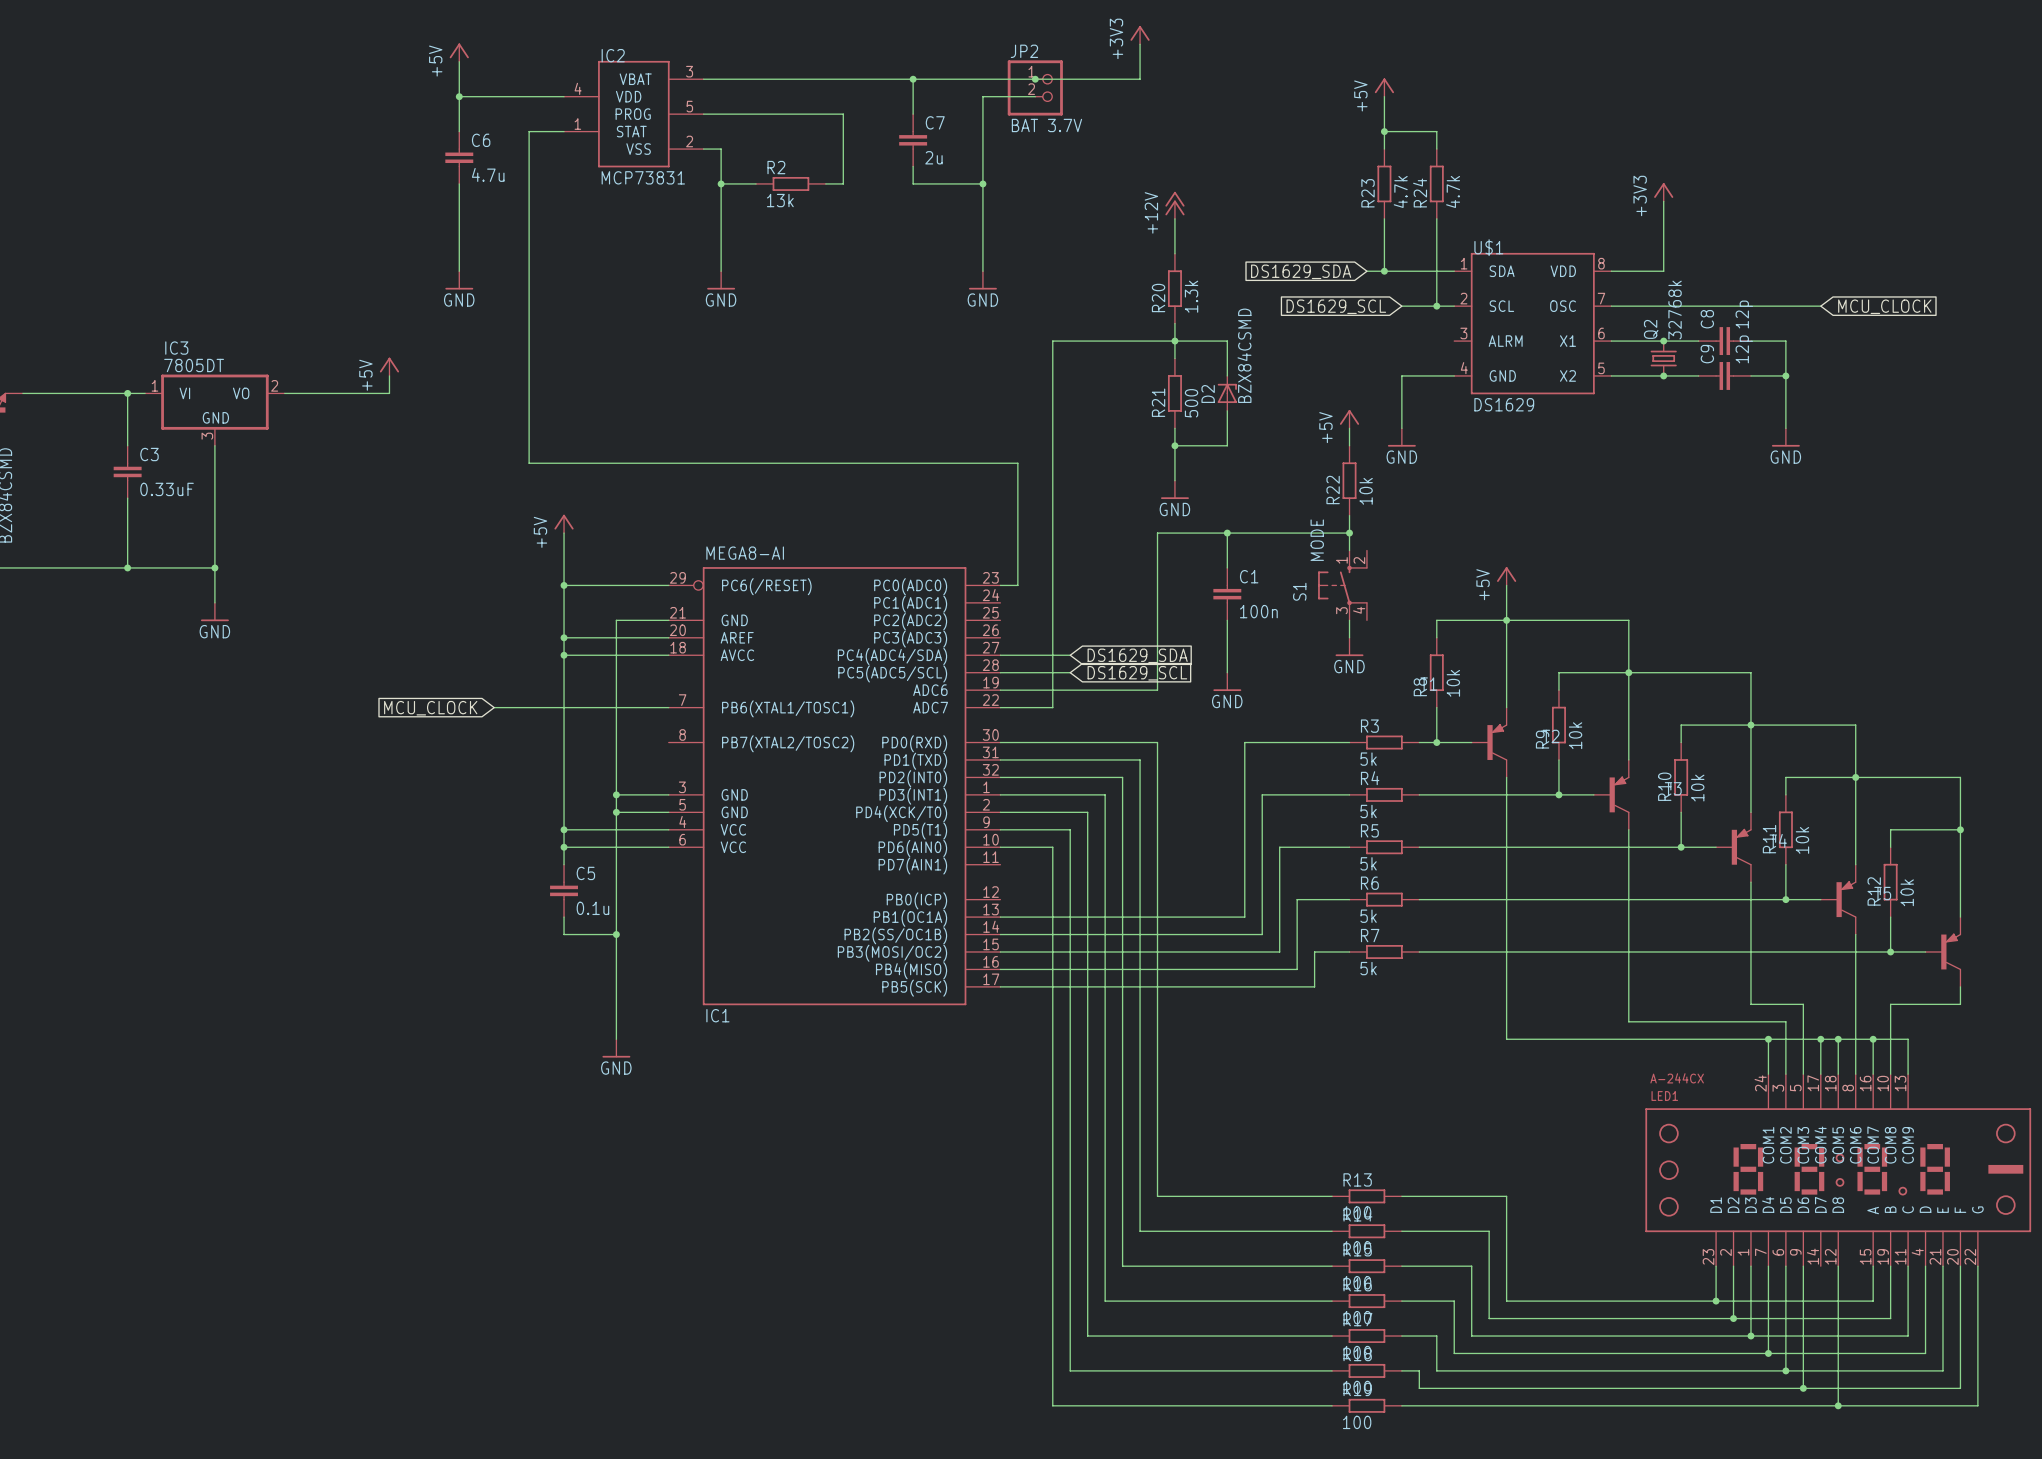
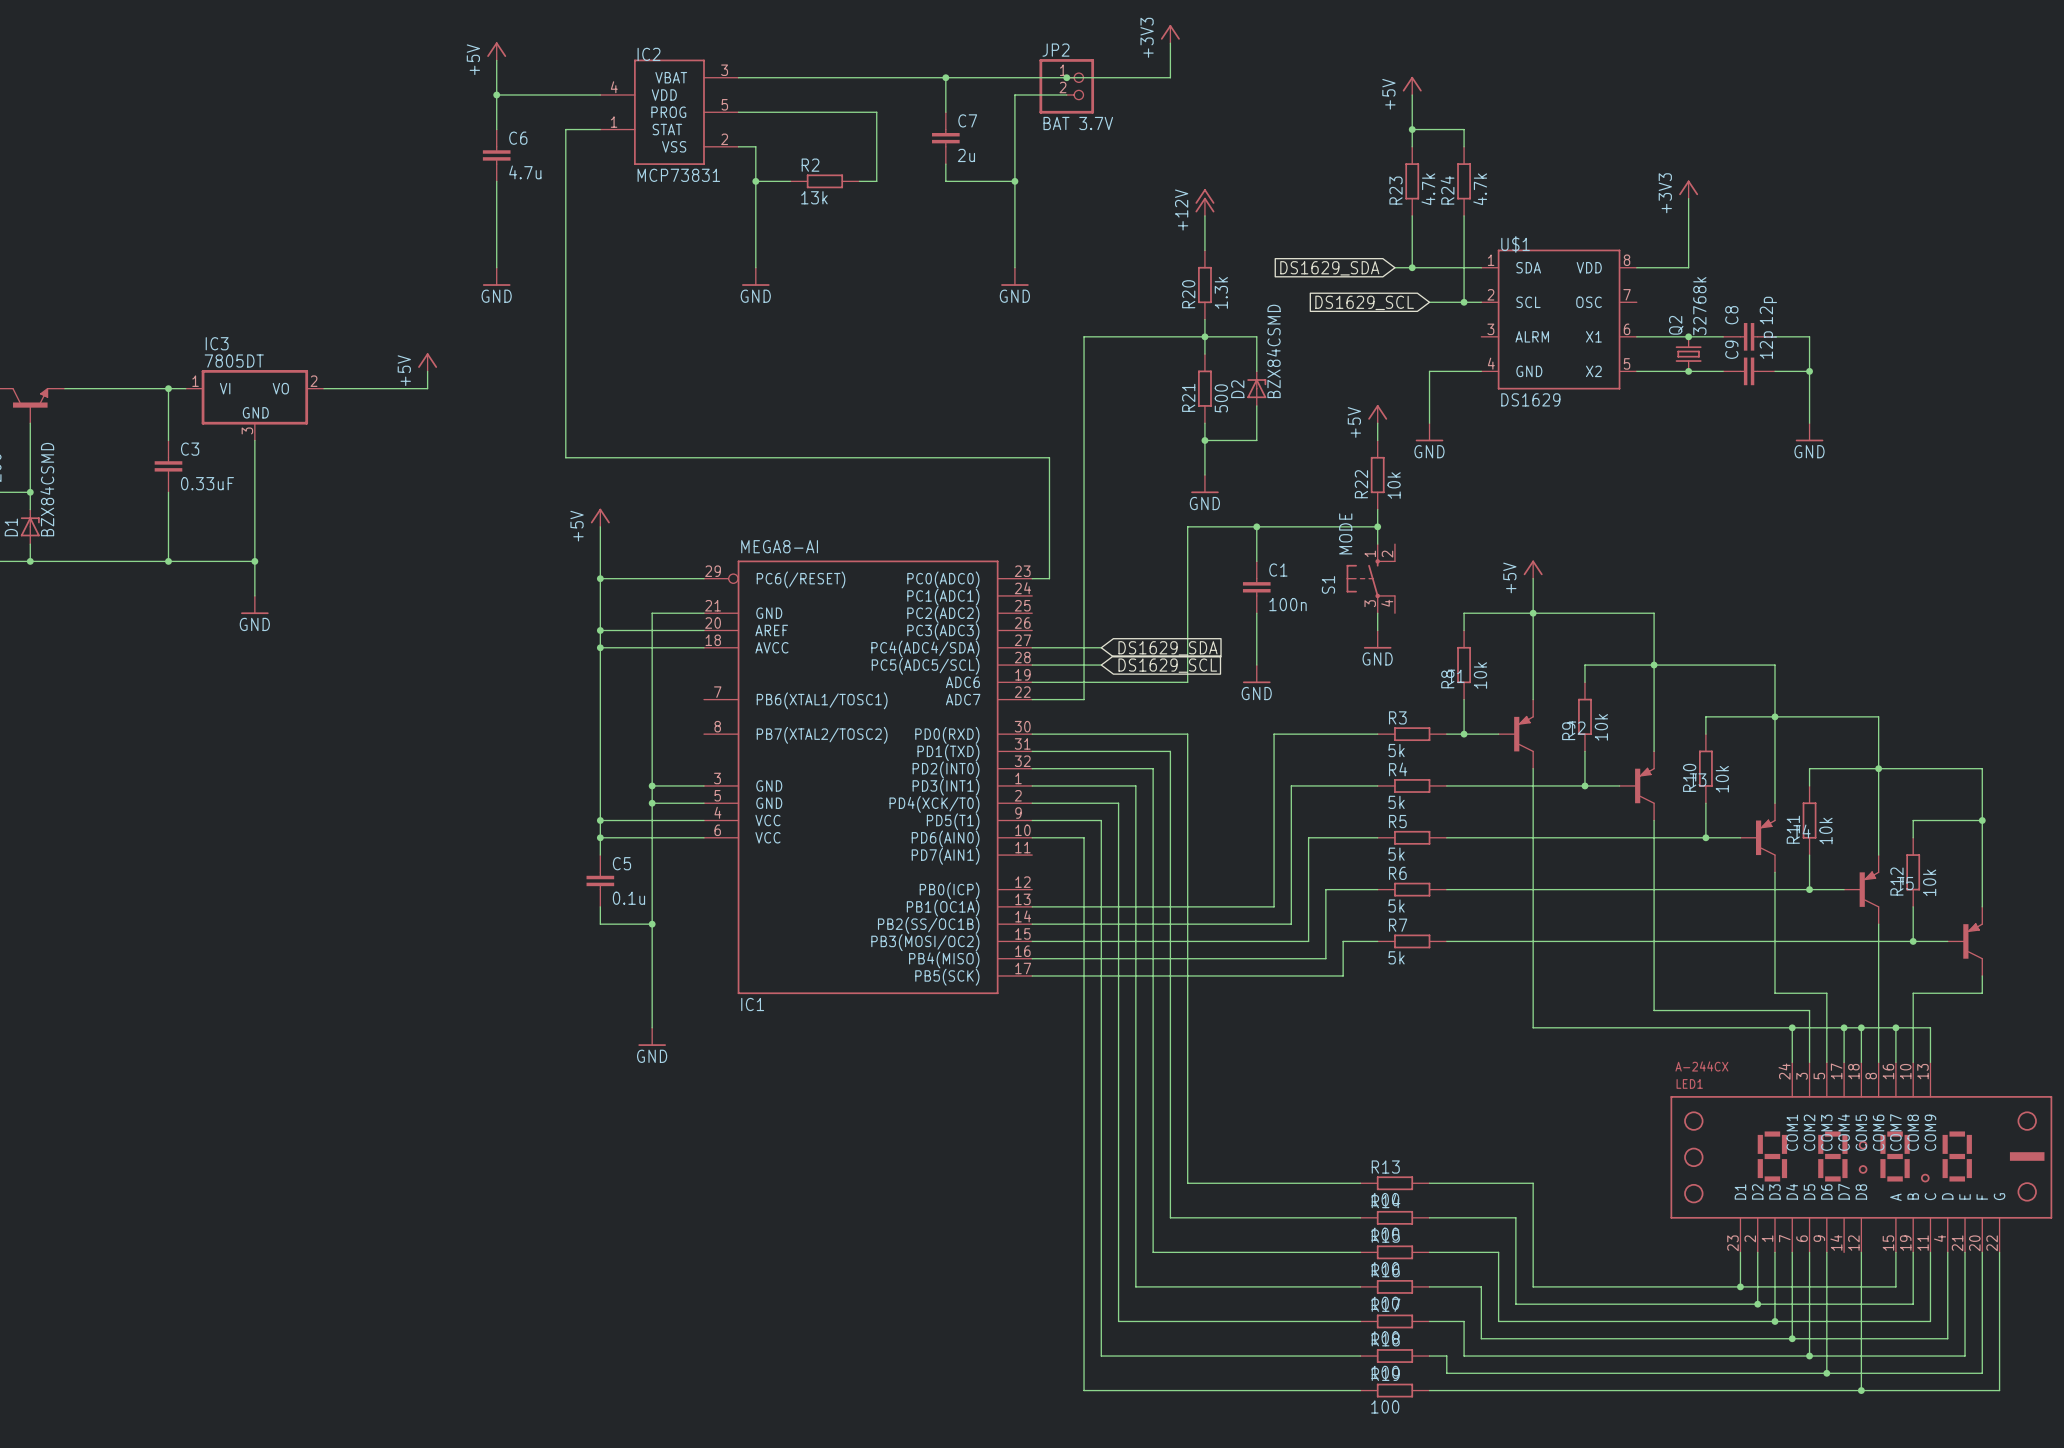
wire: (1611, 306) (1820, 306) -> none
global label: MCU_CLOCK (1884, 306) -> none
wire: (494, 707) (668, 707) -> none
global label: MCU_CLOCK (430, 708) -> none

